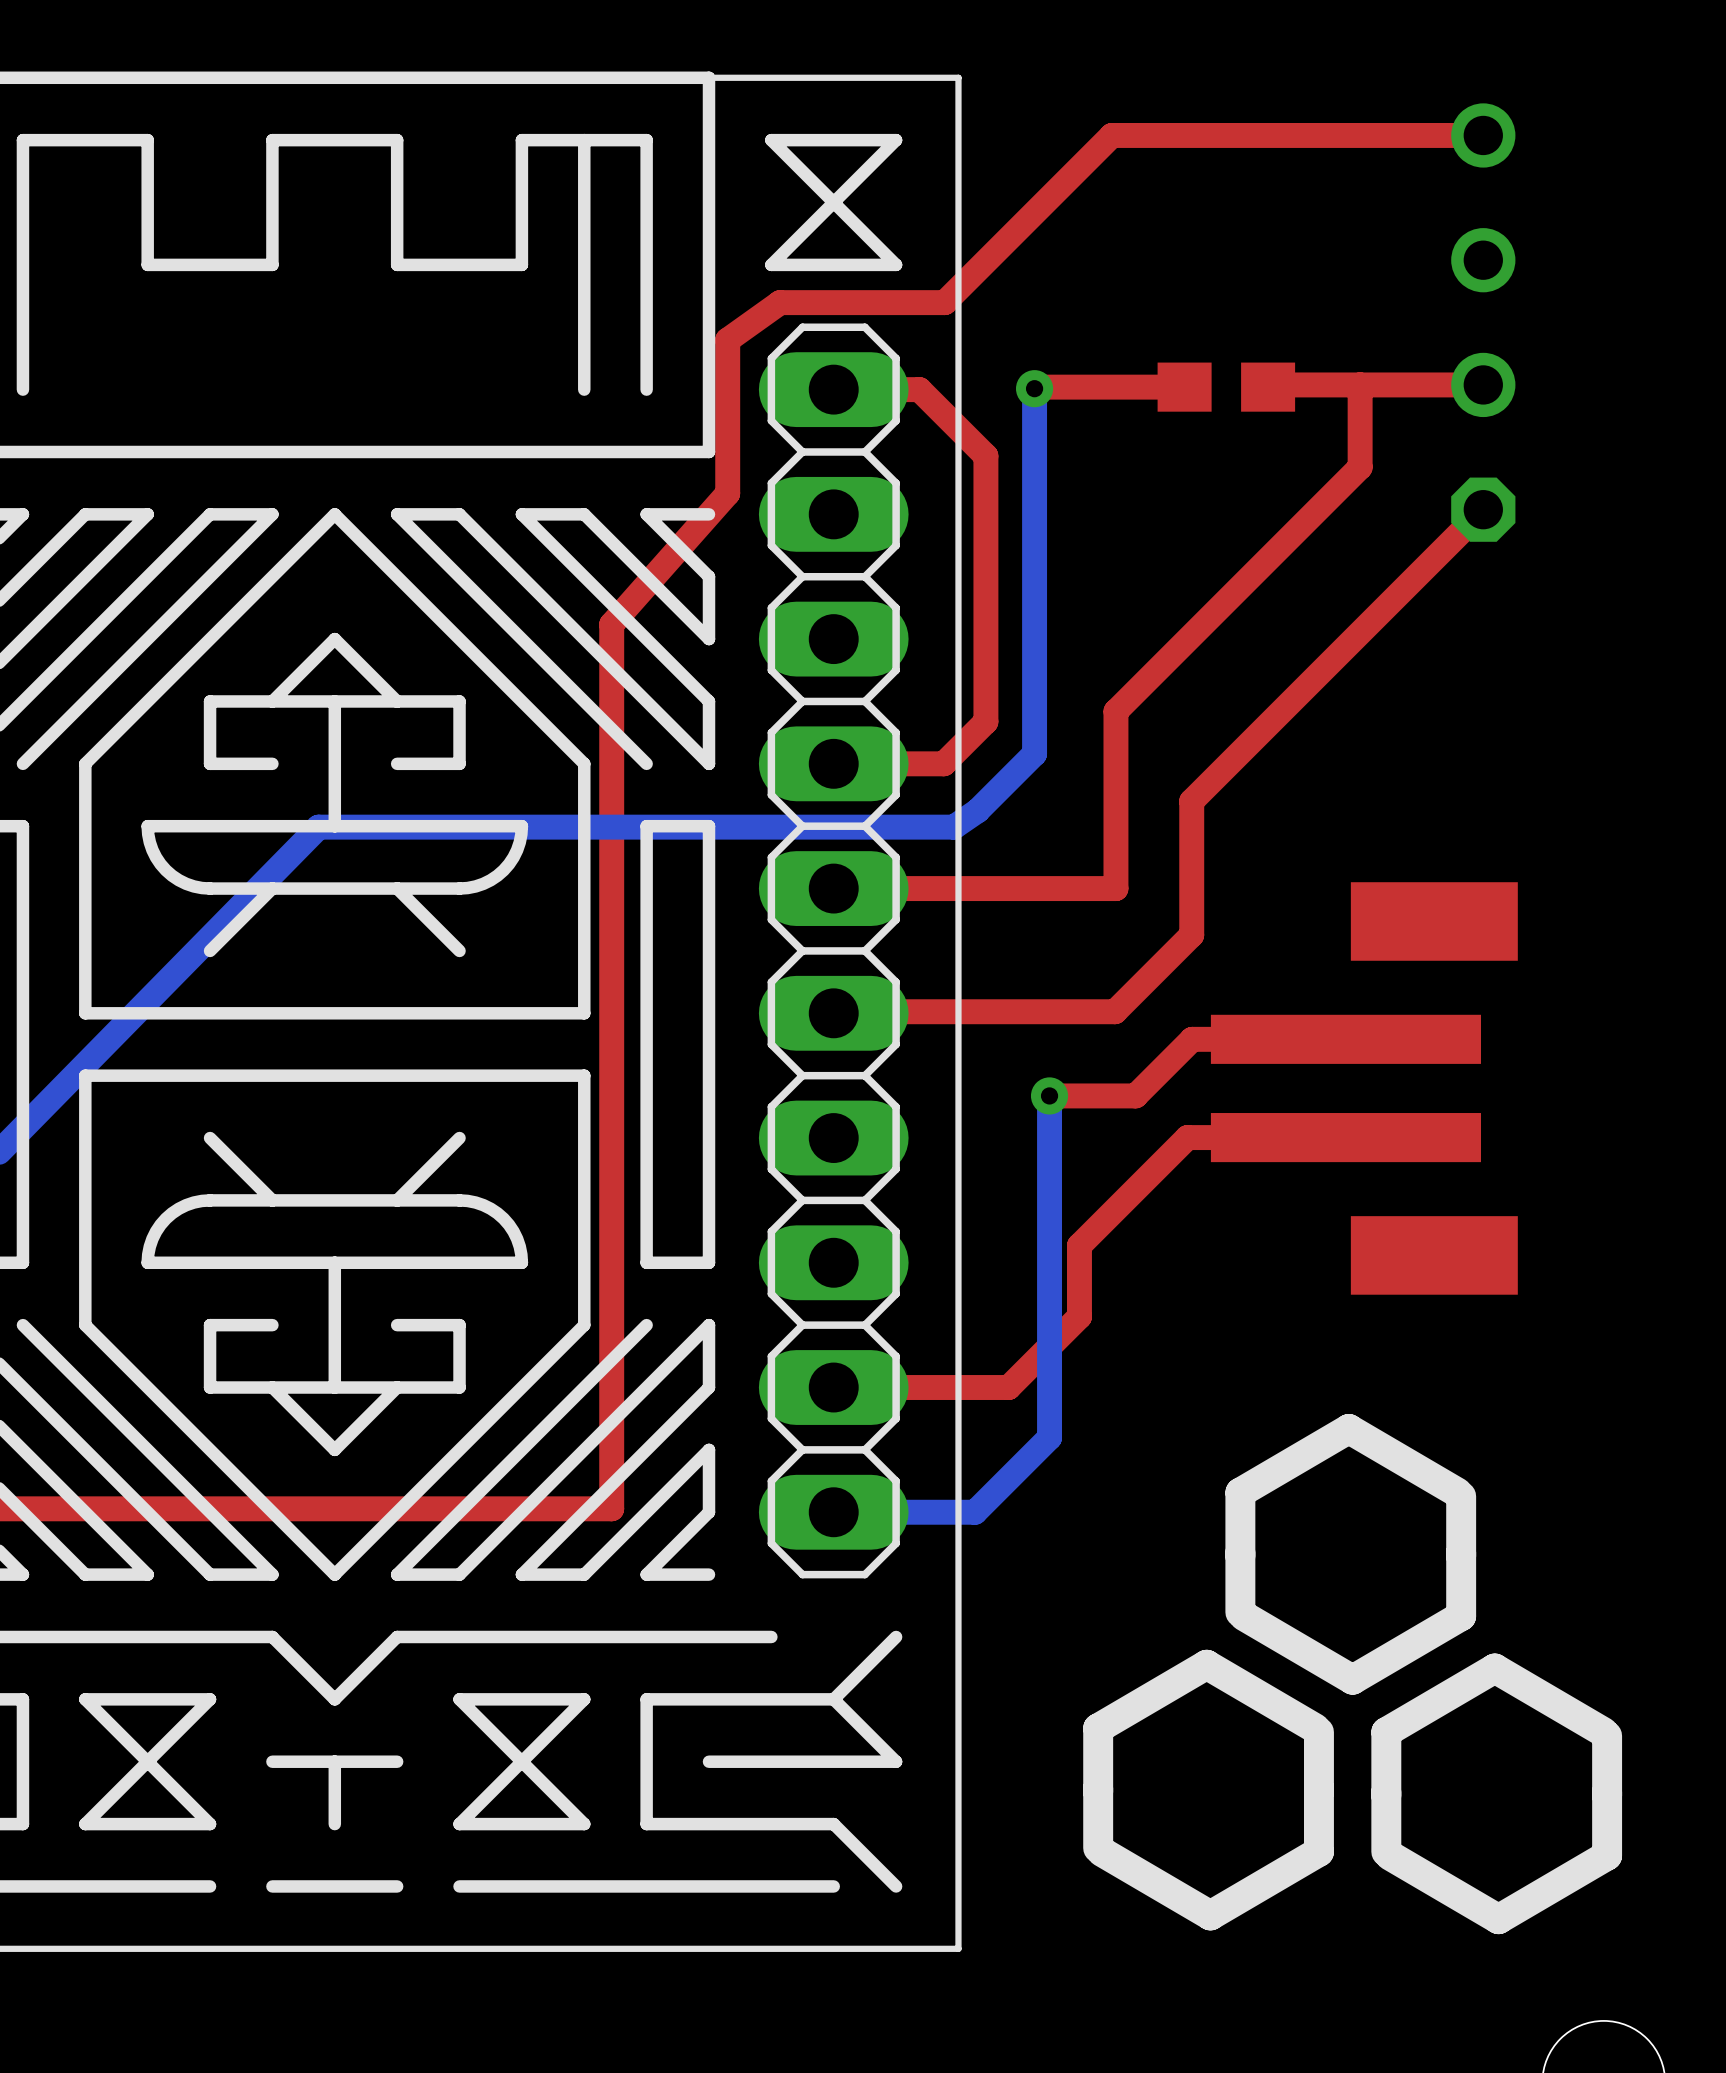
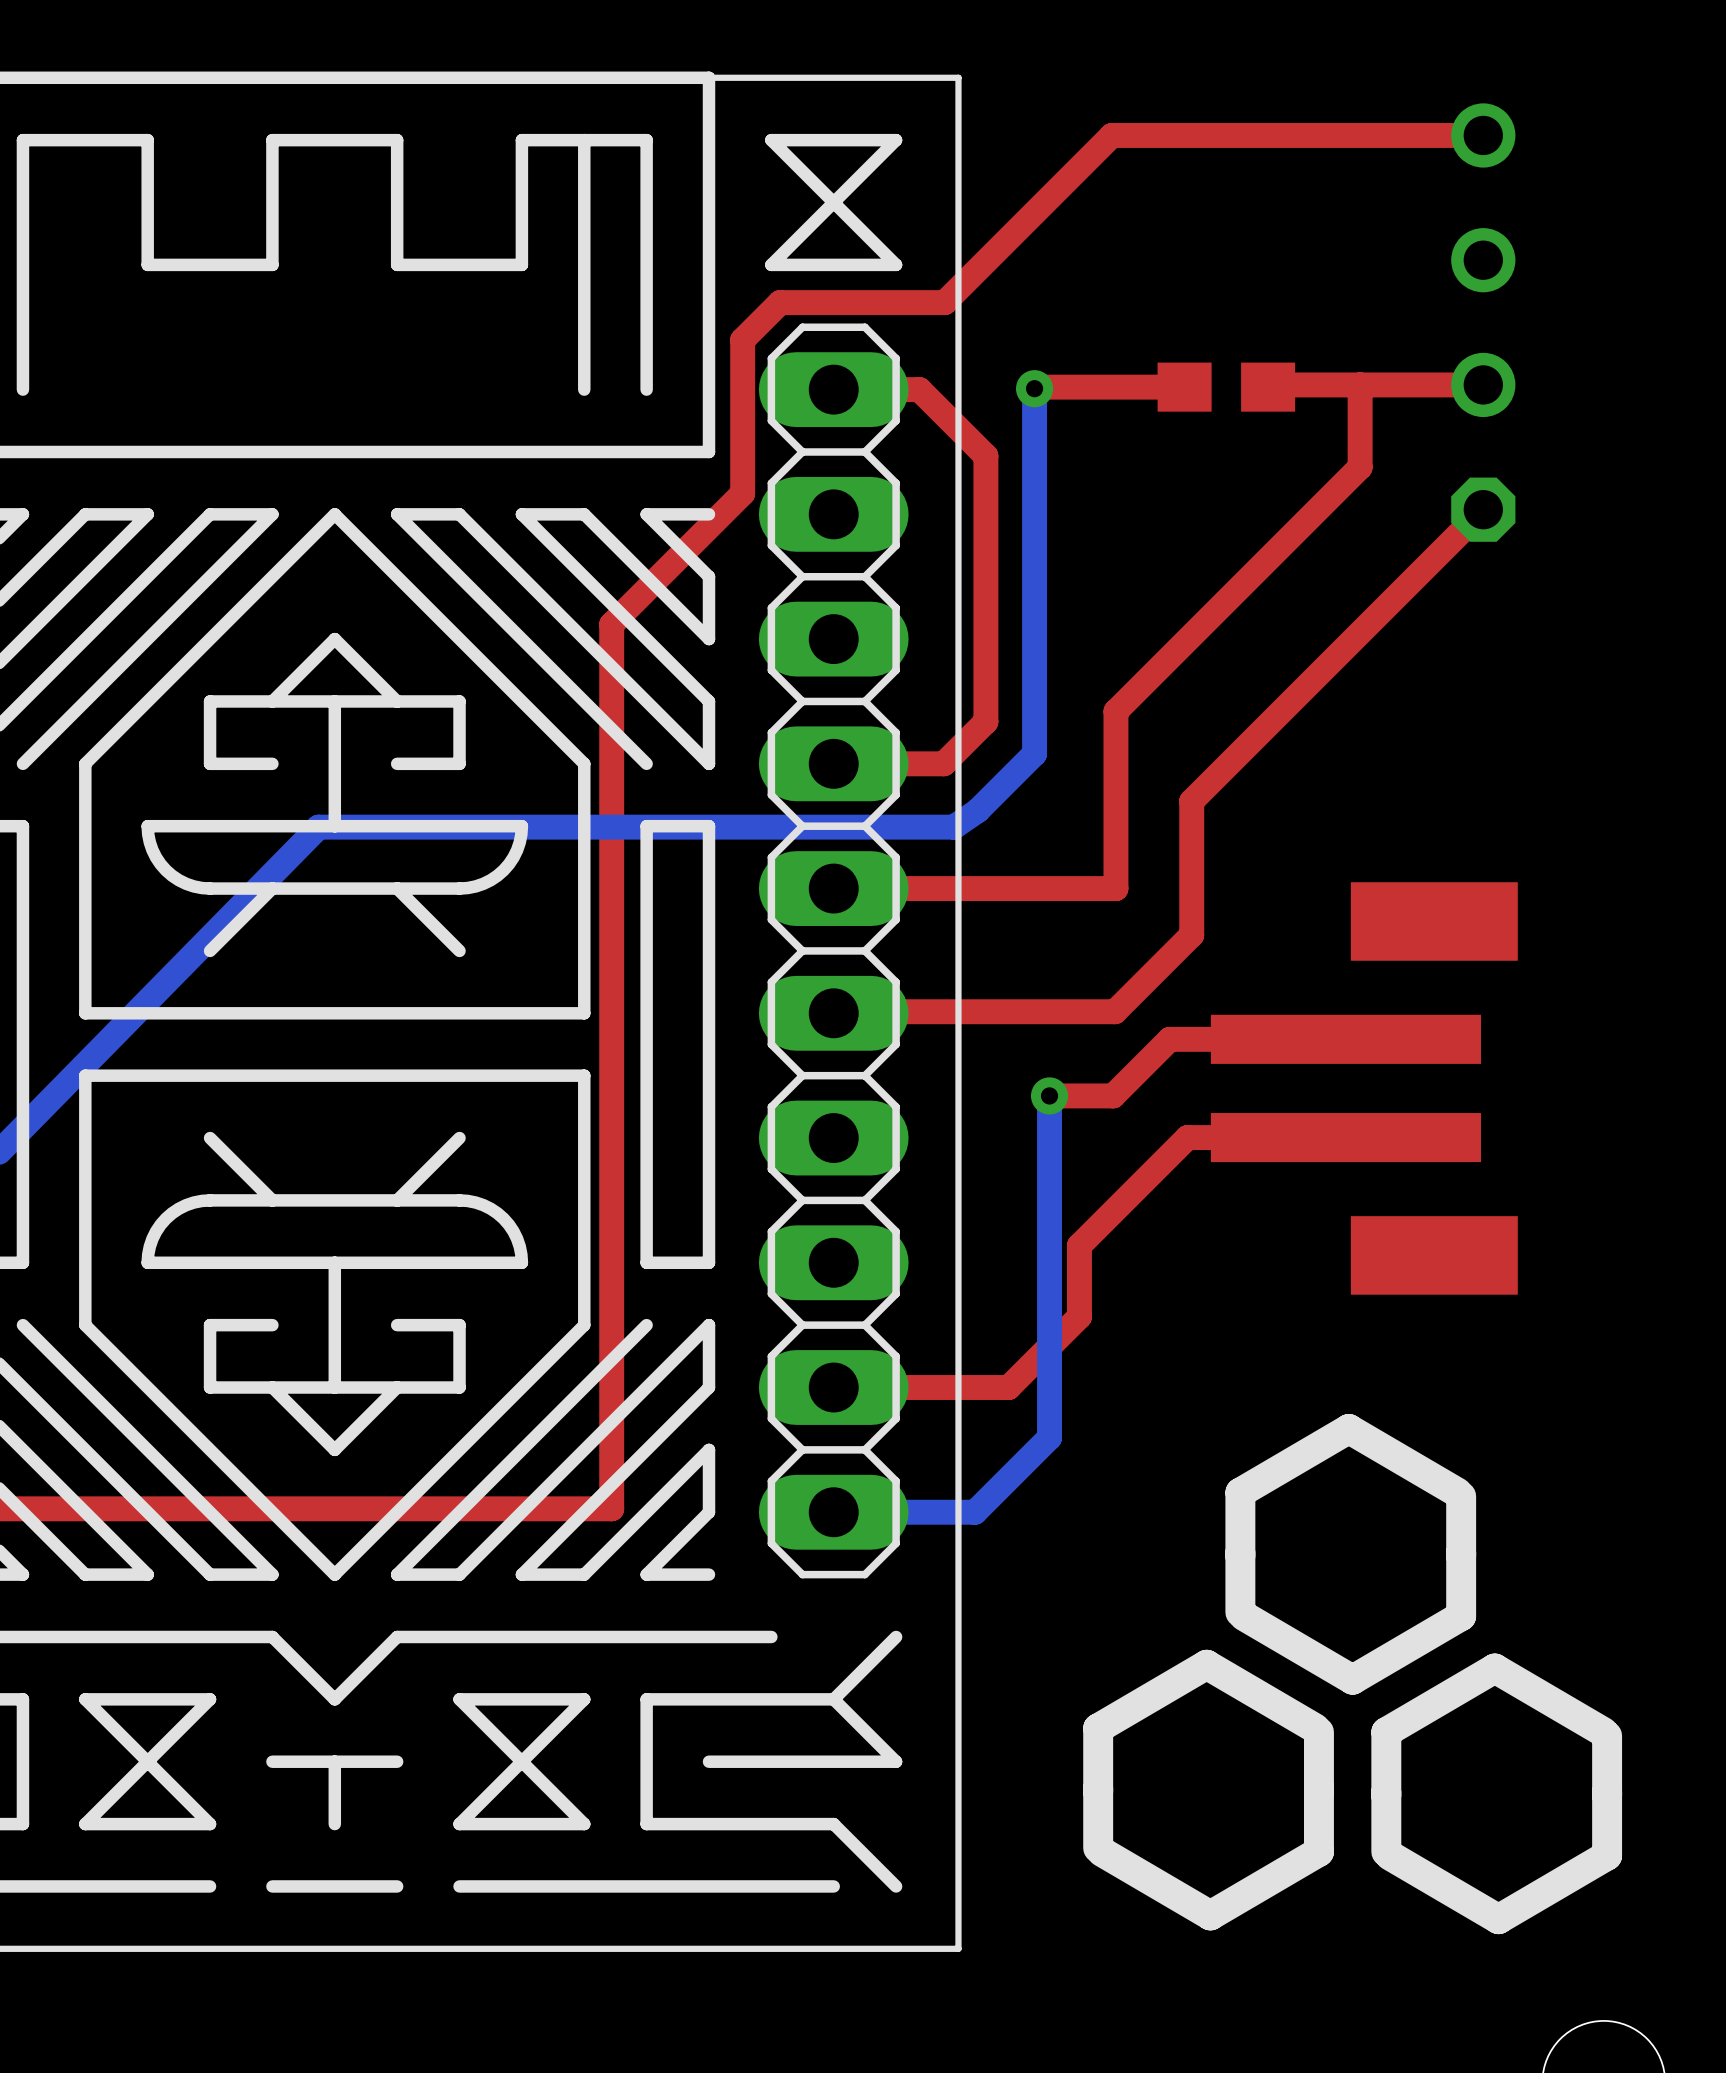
top track: (780, 302) (727, 340) (727, 493) (611, 624) -> (780, 302) (742, 340) (742, 493) (611, 624)
top track: (1192, 1039) (1135, 1095) (1113, 1095) -> (1192, 1039) (1169, 1039) (1113, 1095)

